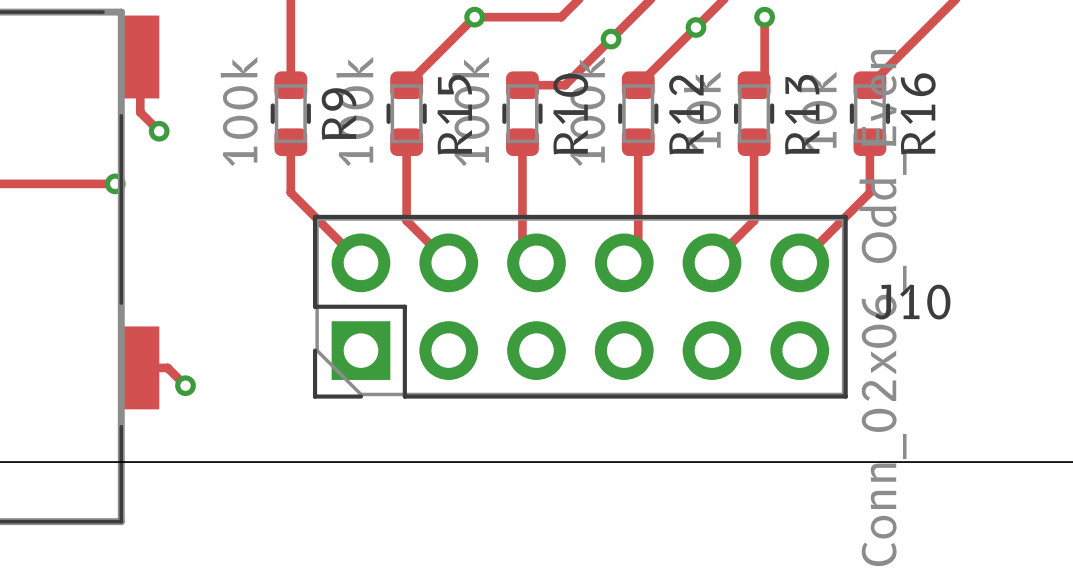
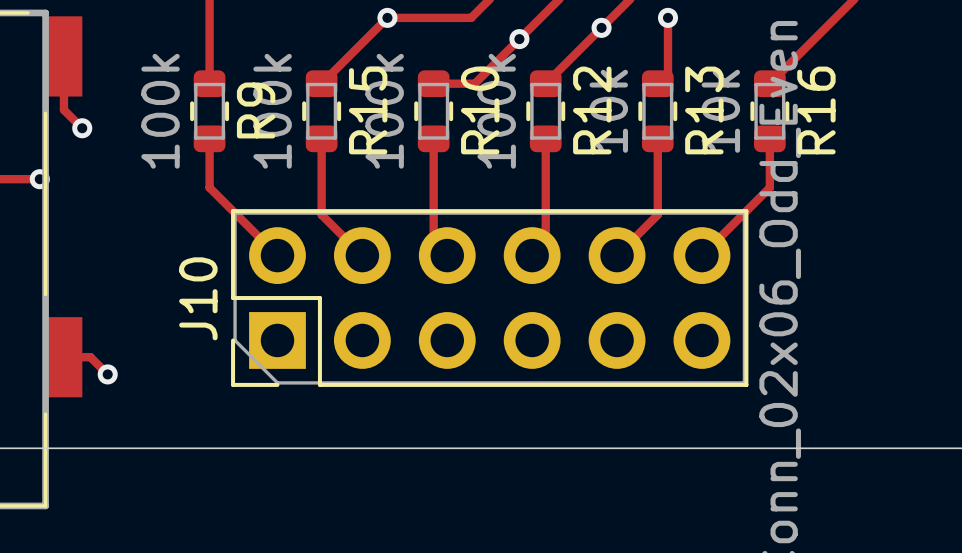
J10 name rotation: 0° (912, 302) -> 90° counterclockwise (198, 298)
J10 name position: J10 (912, 302) -> J10 (198, 298)

